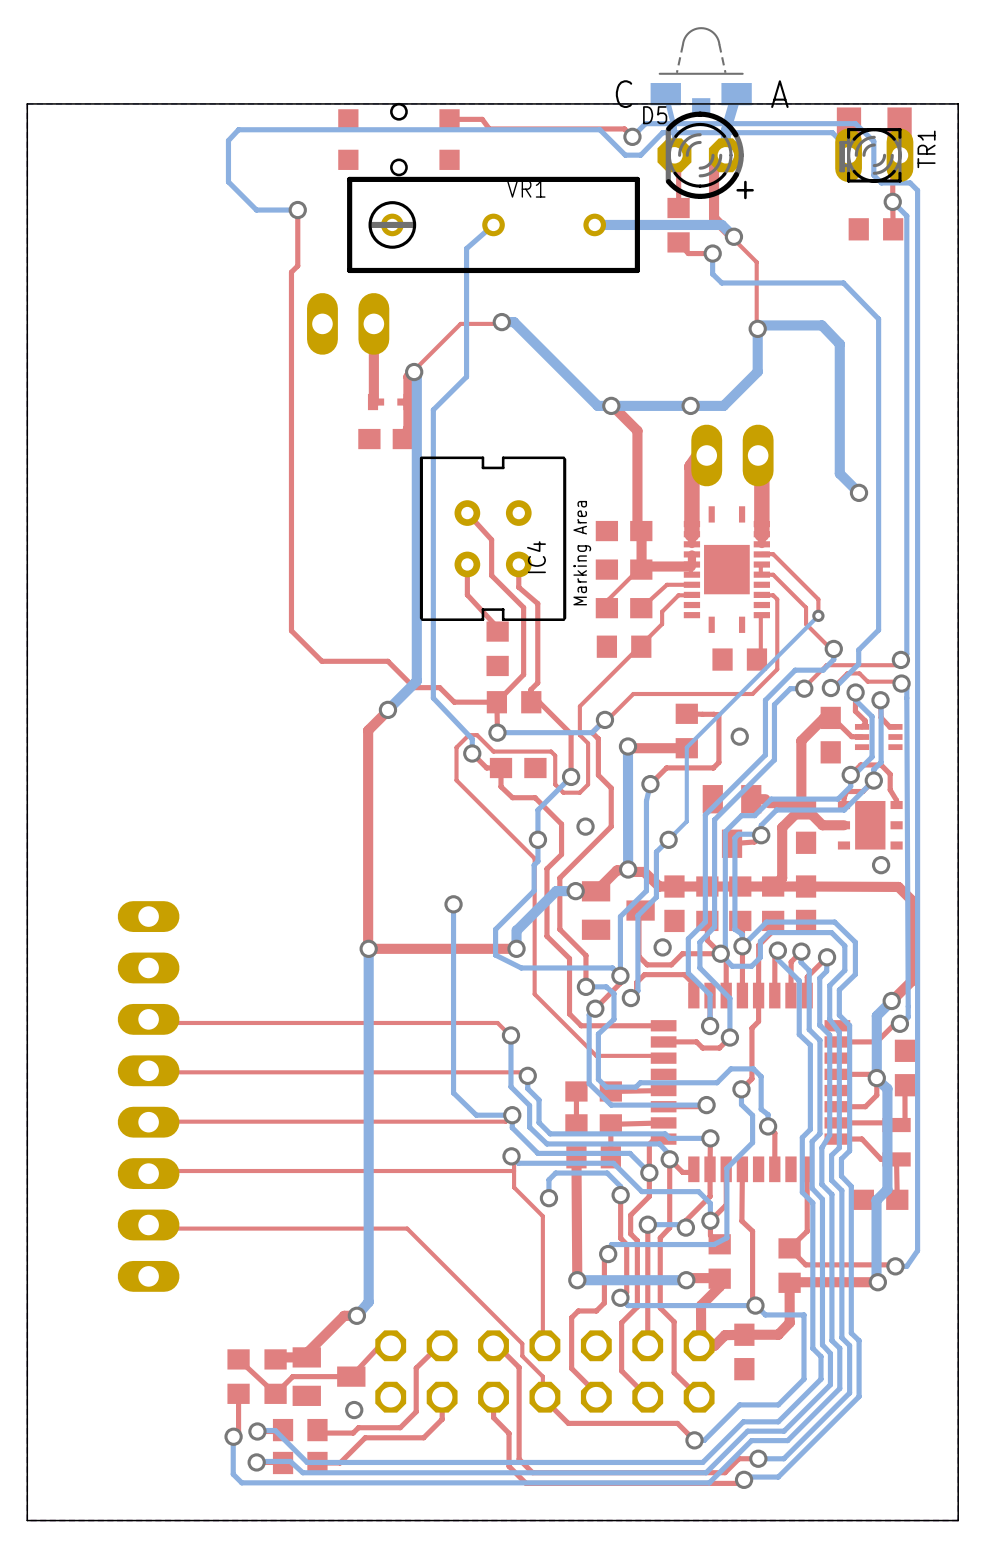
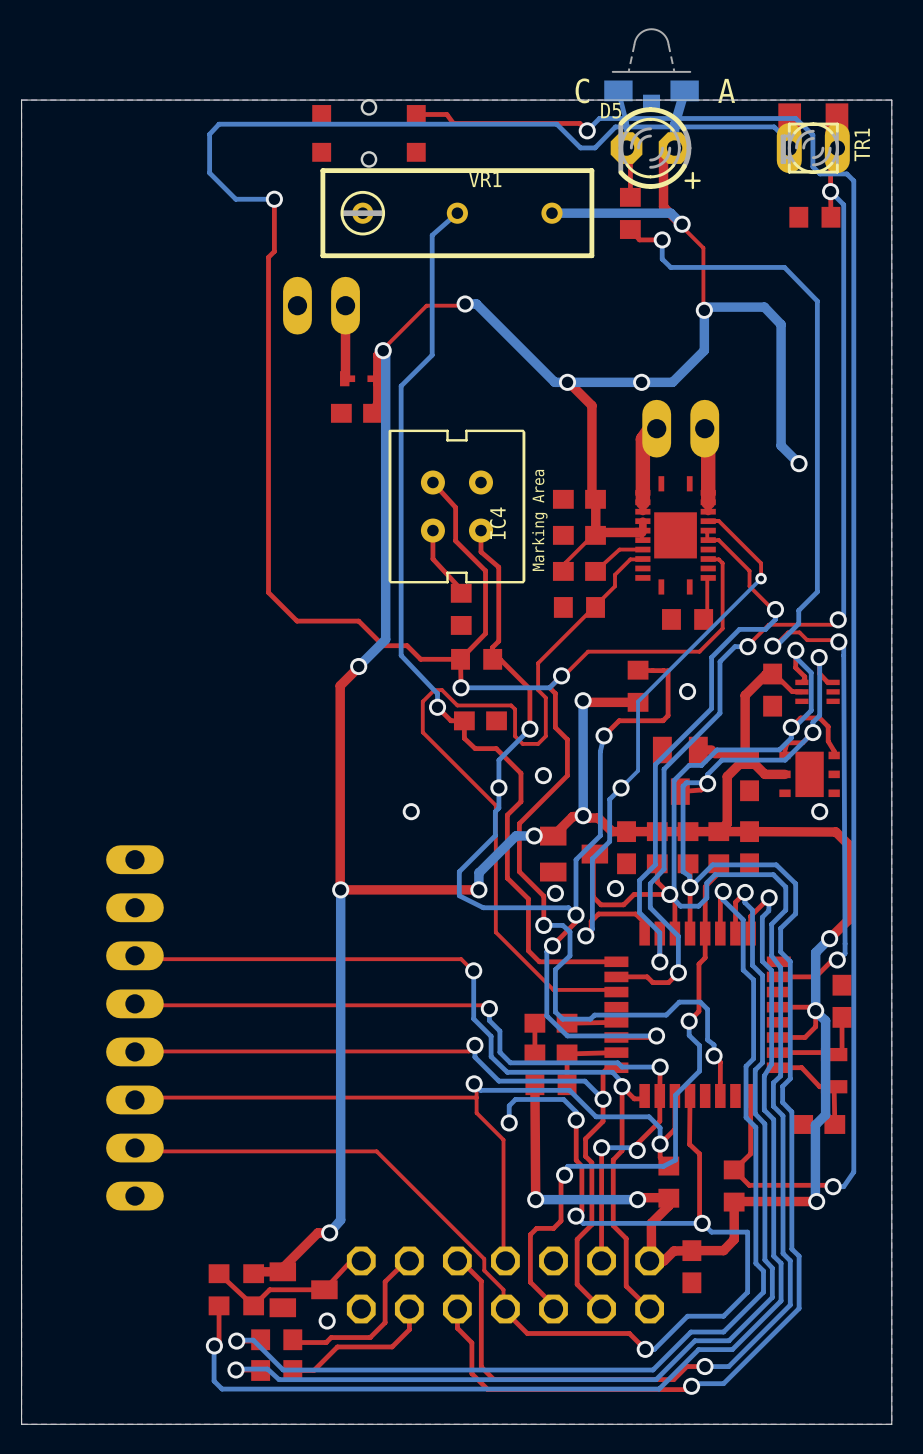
bottom track: (453, 904) (453, 1093) (476, 1115) (512, 1115) -> none
via position: (453, 904) -> (411, 811)
via: none -> (555, 893)

